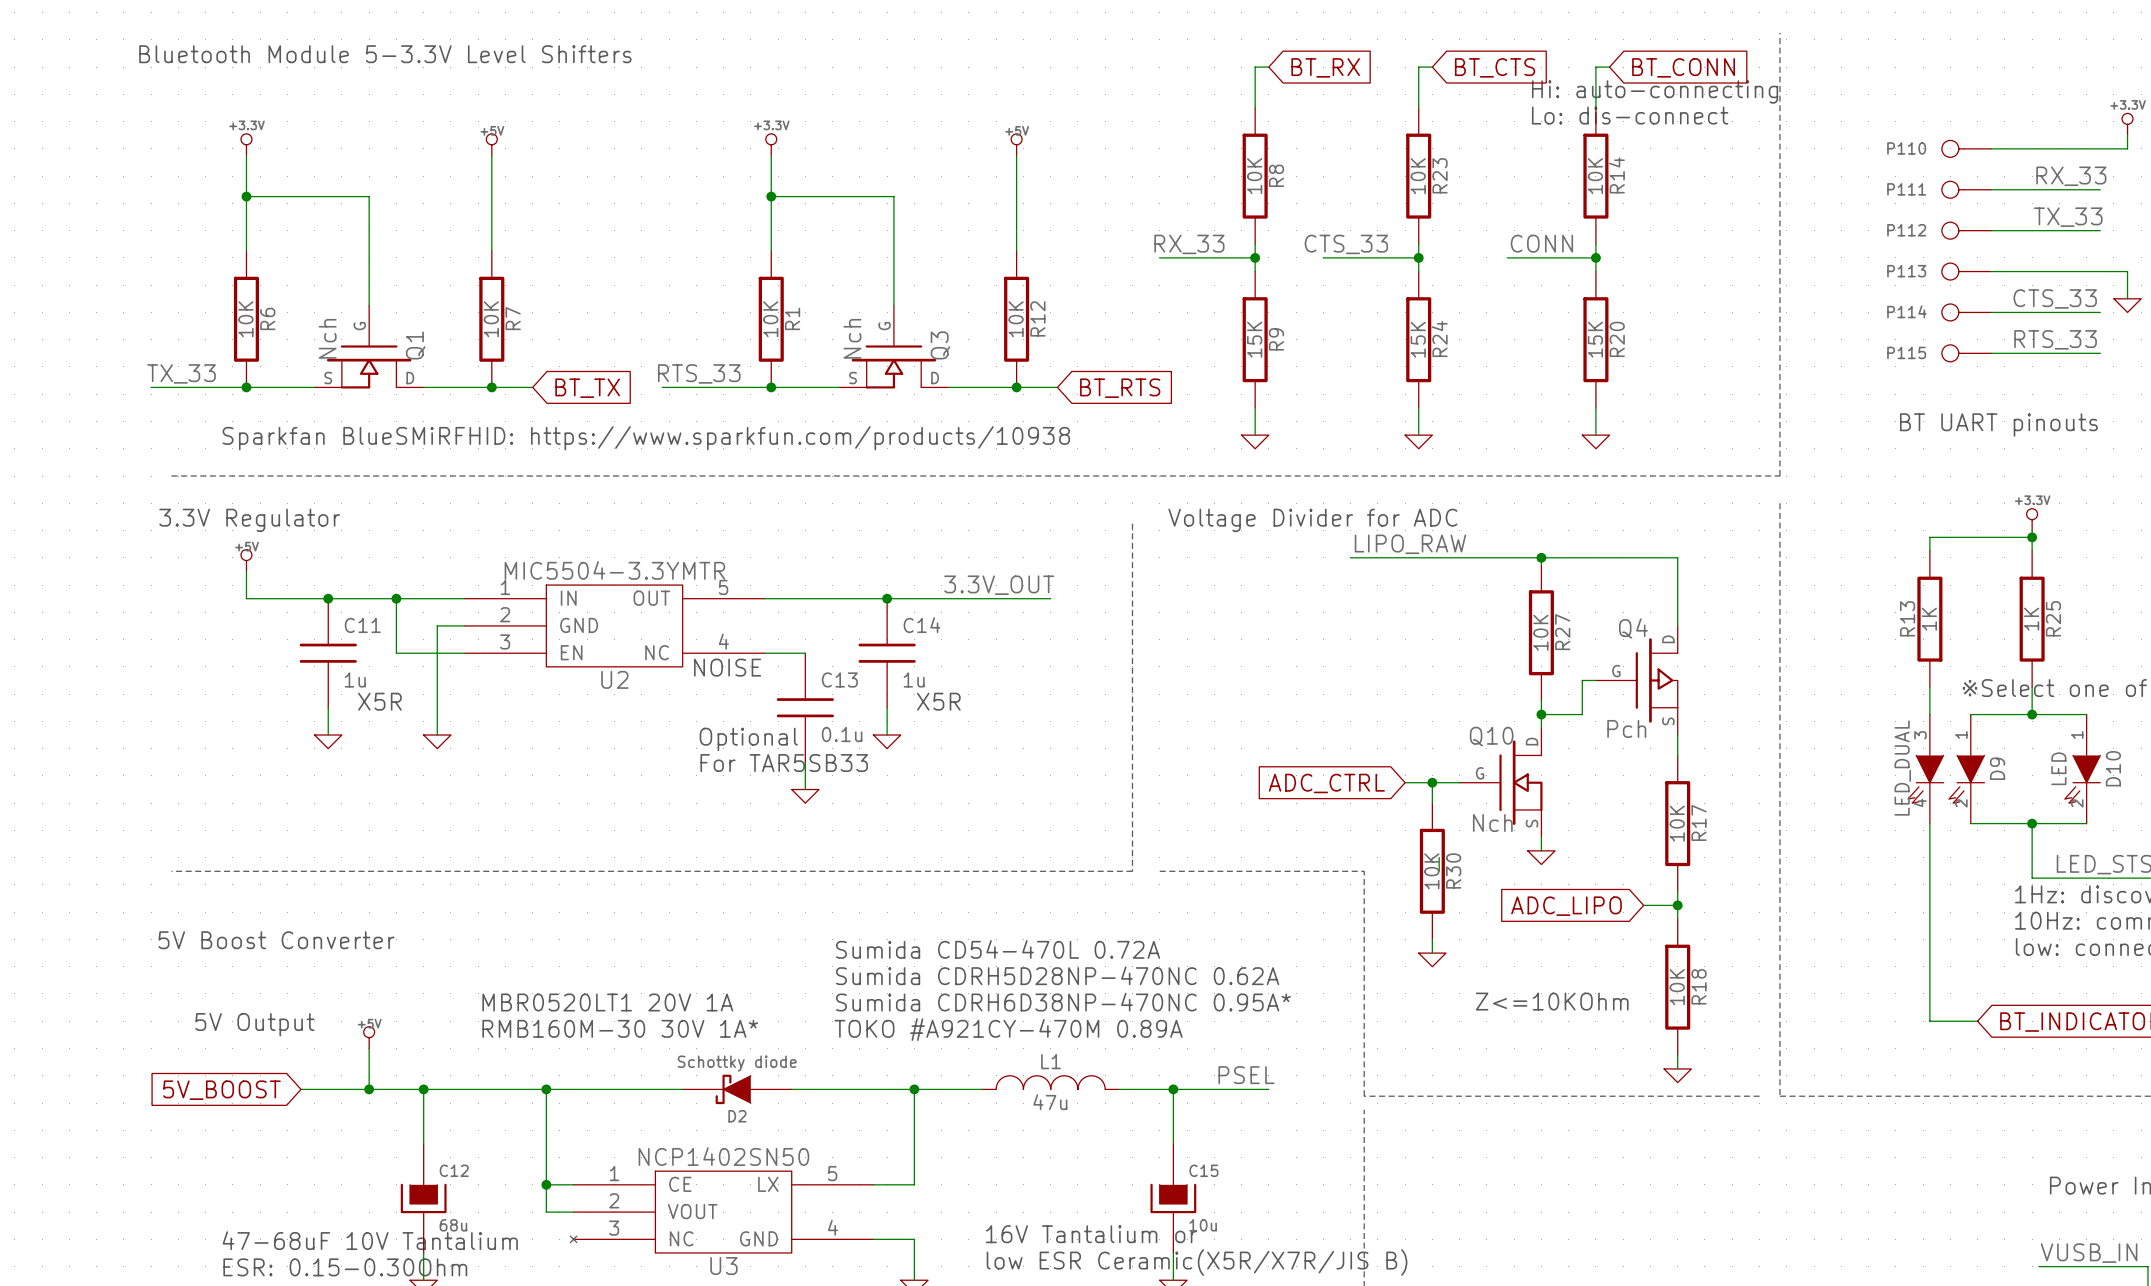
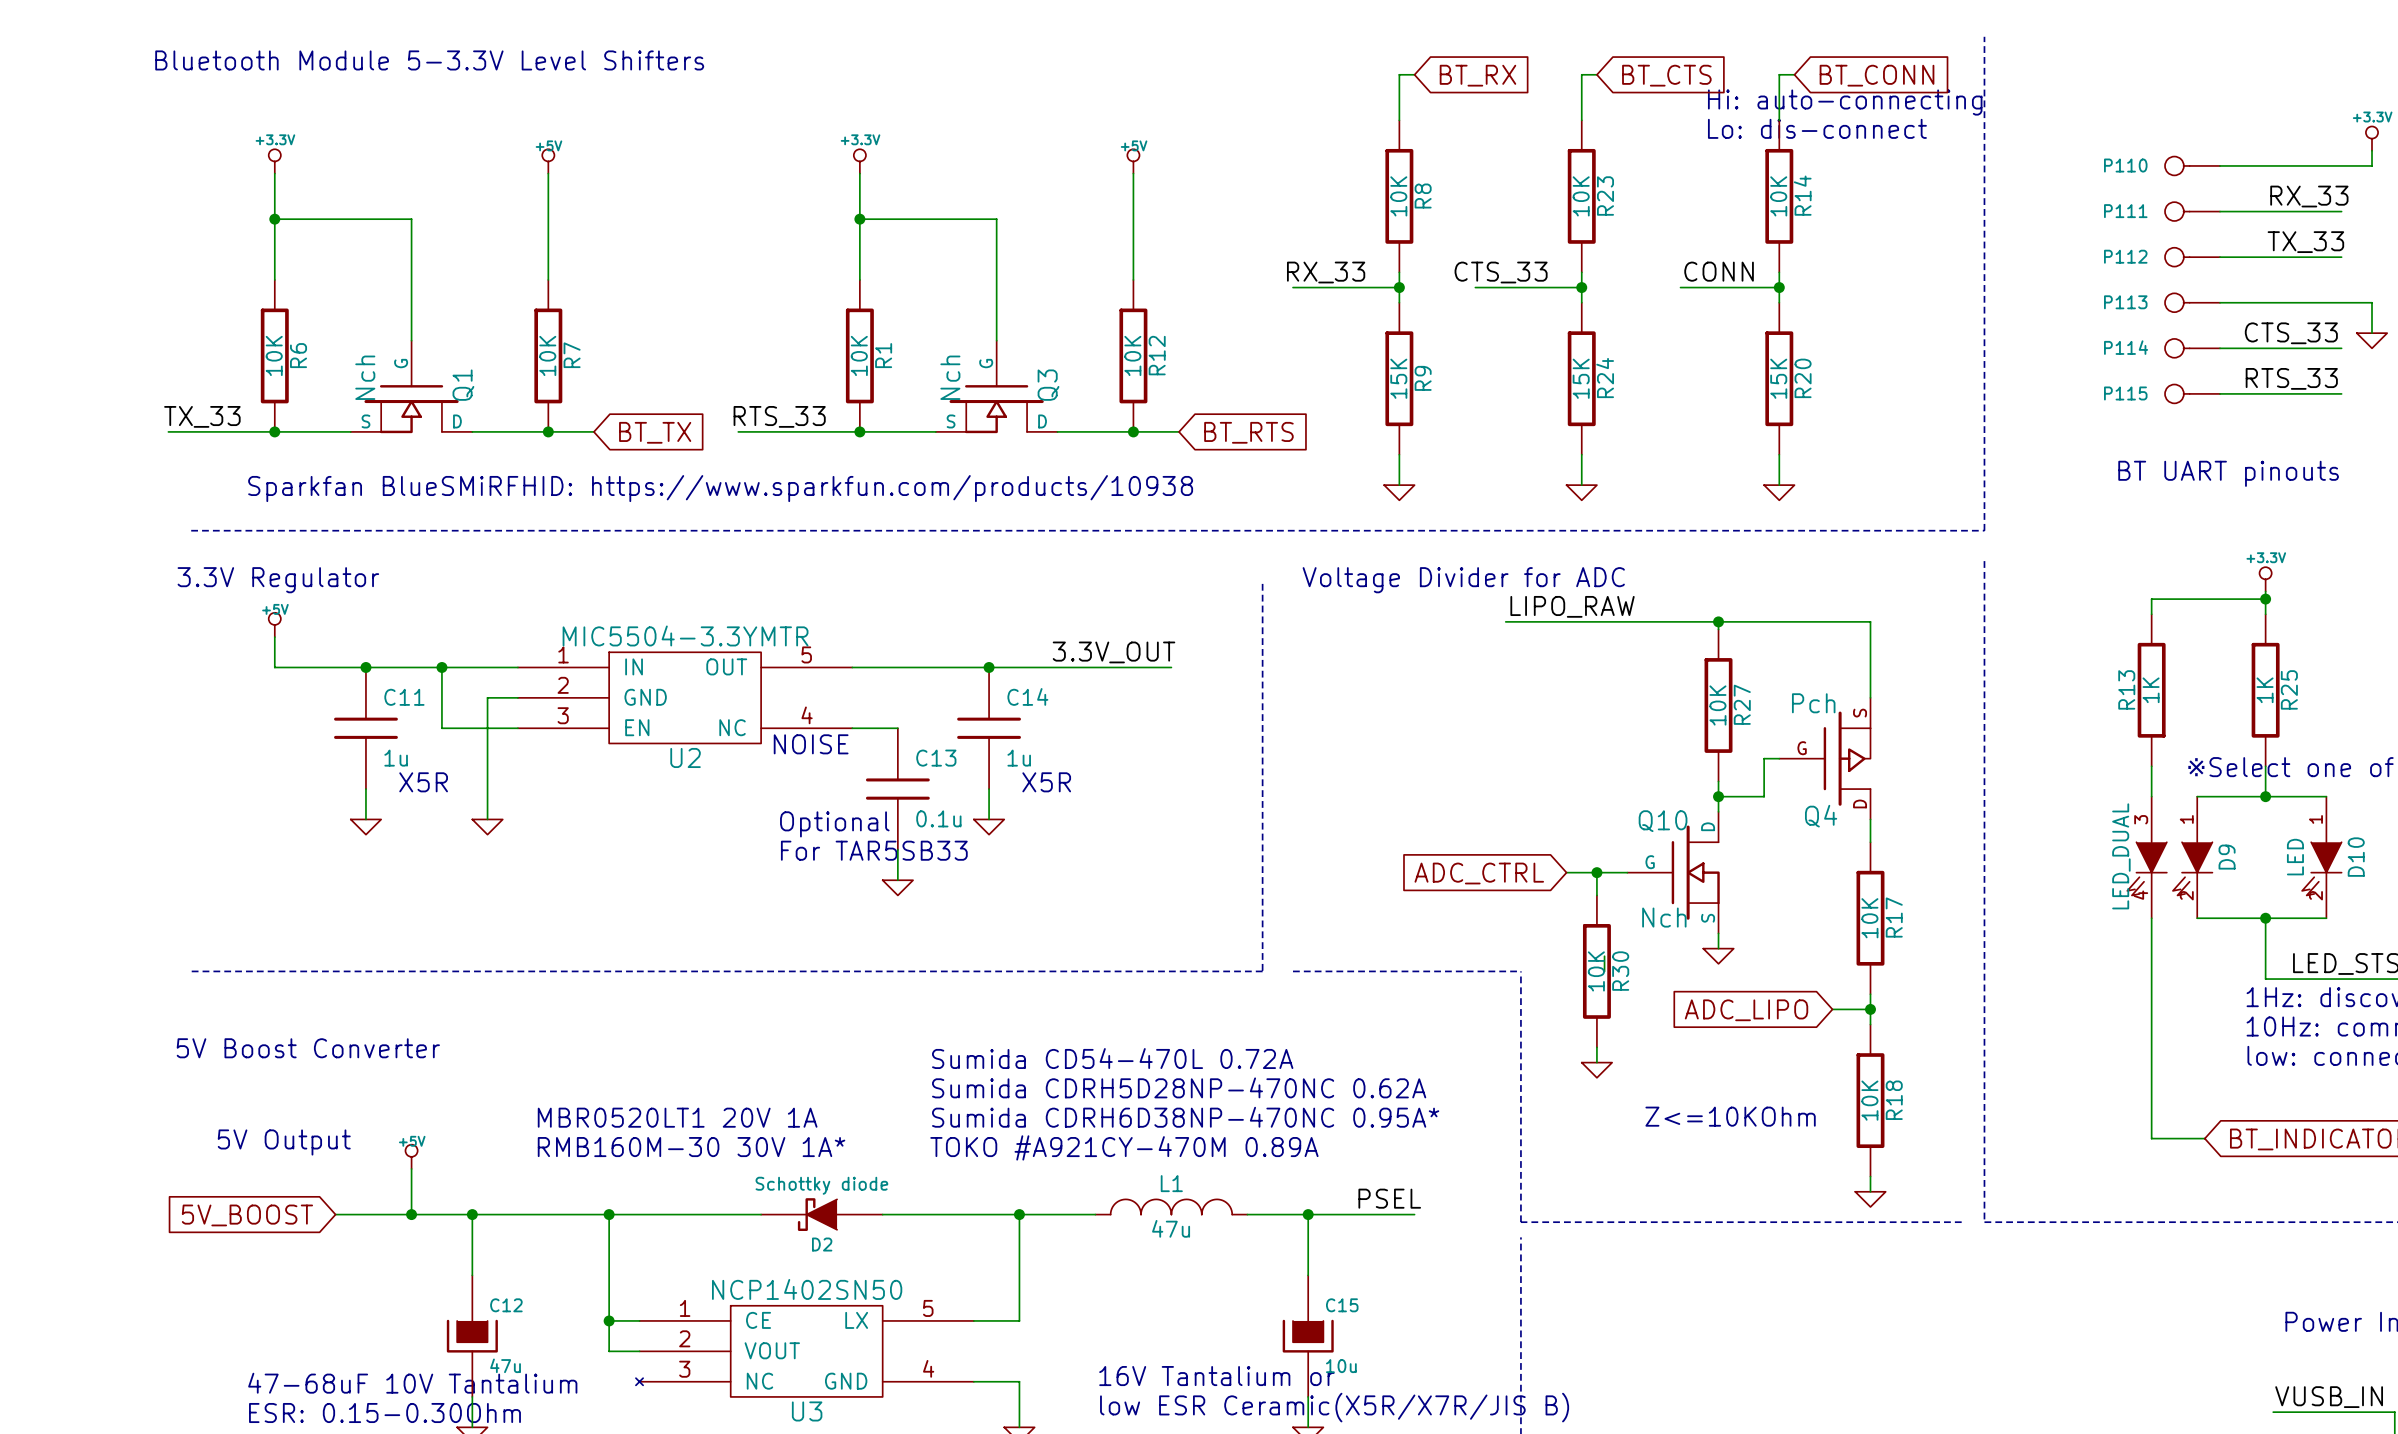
Q4 flip: as is (1656, 680) -> up-down (1847, 758)
C12 value: 68u (453, 1225) -> 47u (505, 1365)

